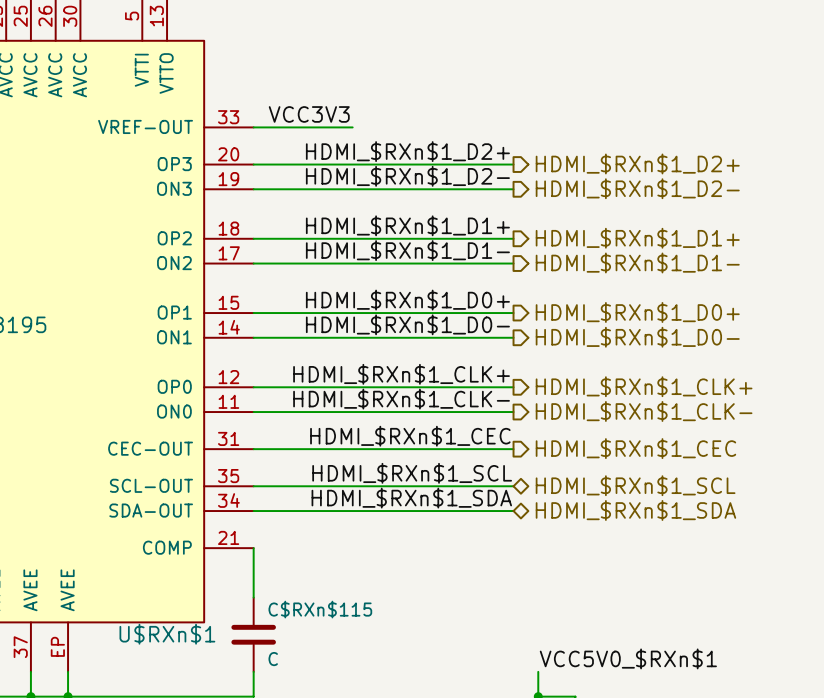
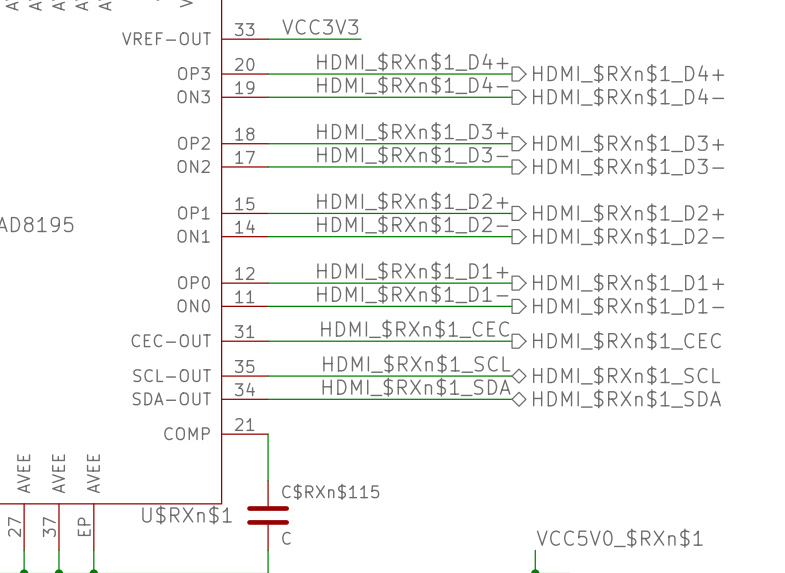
label: HDMI_$RXn$1_D2+ (407, 151) -> HDMI_$RXn$1_D4+ (412, 61)
hierarchical label: HDMI_$RXn$1_D2+ (637, 163) -> HDMI_$RXn$1_D4+ (628, 73)
label: HDMI_$RXn$1_D2- (407, 176) -> HDMI_$RXn$1_D4- (412, 85)
hierarchical label: HDMI_$RXn$1_D2- (637, 188) -> HDMI_$RXn$1_D4- (628, 96)
label: HDMI_$RXn$1_D1+ (407, 225) -> HDMI_$RXn$1_D3+ (412, 131)
hierarchical label: HDMI_$RXn$1_D1+ (637, 238) -> HDMI_$RXn$1_D3+ (628, 143)
label: HDMI_$RXn$1_D1- (407, 250) -> HDMI_$RXn$1_D3- (412, 154)
hierarchical label: HDMI_$RXn$1_D1- (637, 262) -> HDMI_$RXn$1_D3- (628, 166)
label: HDMI_$RXn$1_D0+ (407, 300) -> HDMI_$RXn$1_D2+ (412, 201)
hierarchical label: HDMI_$RXn$1_D0+ (637, 312) -> HDMI_$RXn$1_D2+ (628, 212)
label: HDMI_$RXn$1_D0- (407, 324) -> HDMI_$RXn$1_D2- (412, 224)
hierarchical label: HDMI_$RXn$1_D0- (637, 337) -> HDMI_$RXn$1_D2- (628, 236)
label: HDMI_$RXn$1_CLK+ (401, 374) -> HDMI_$RXn$1_D1+ (412, 270)
hierarchical label: HDMI_$RXn$1_CLK+ (644, 386) -> HDMI_$RXn$1_D1+ (628, 282)
label: HDMI_$RXn$1_CLK- (401, 399) -> HDMI_$RXn$1_D1- (412, 294)
hierarchical label: HDMI_$RXn$1_CLK- (644, 411) -> HDMI_$RXn$1_D1- (628, 305)

